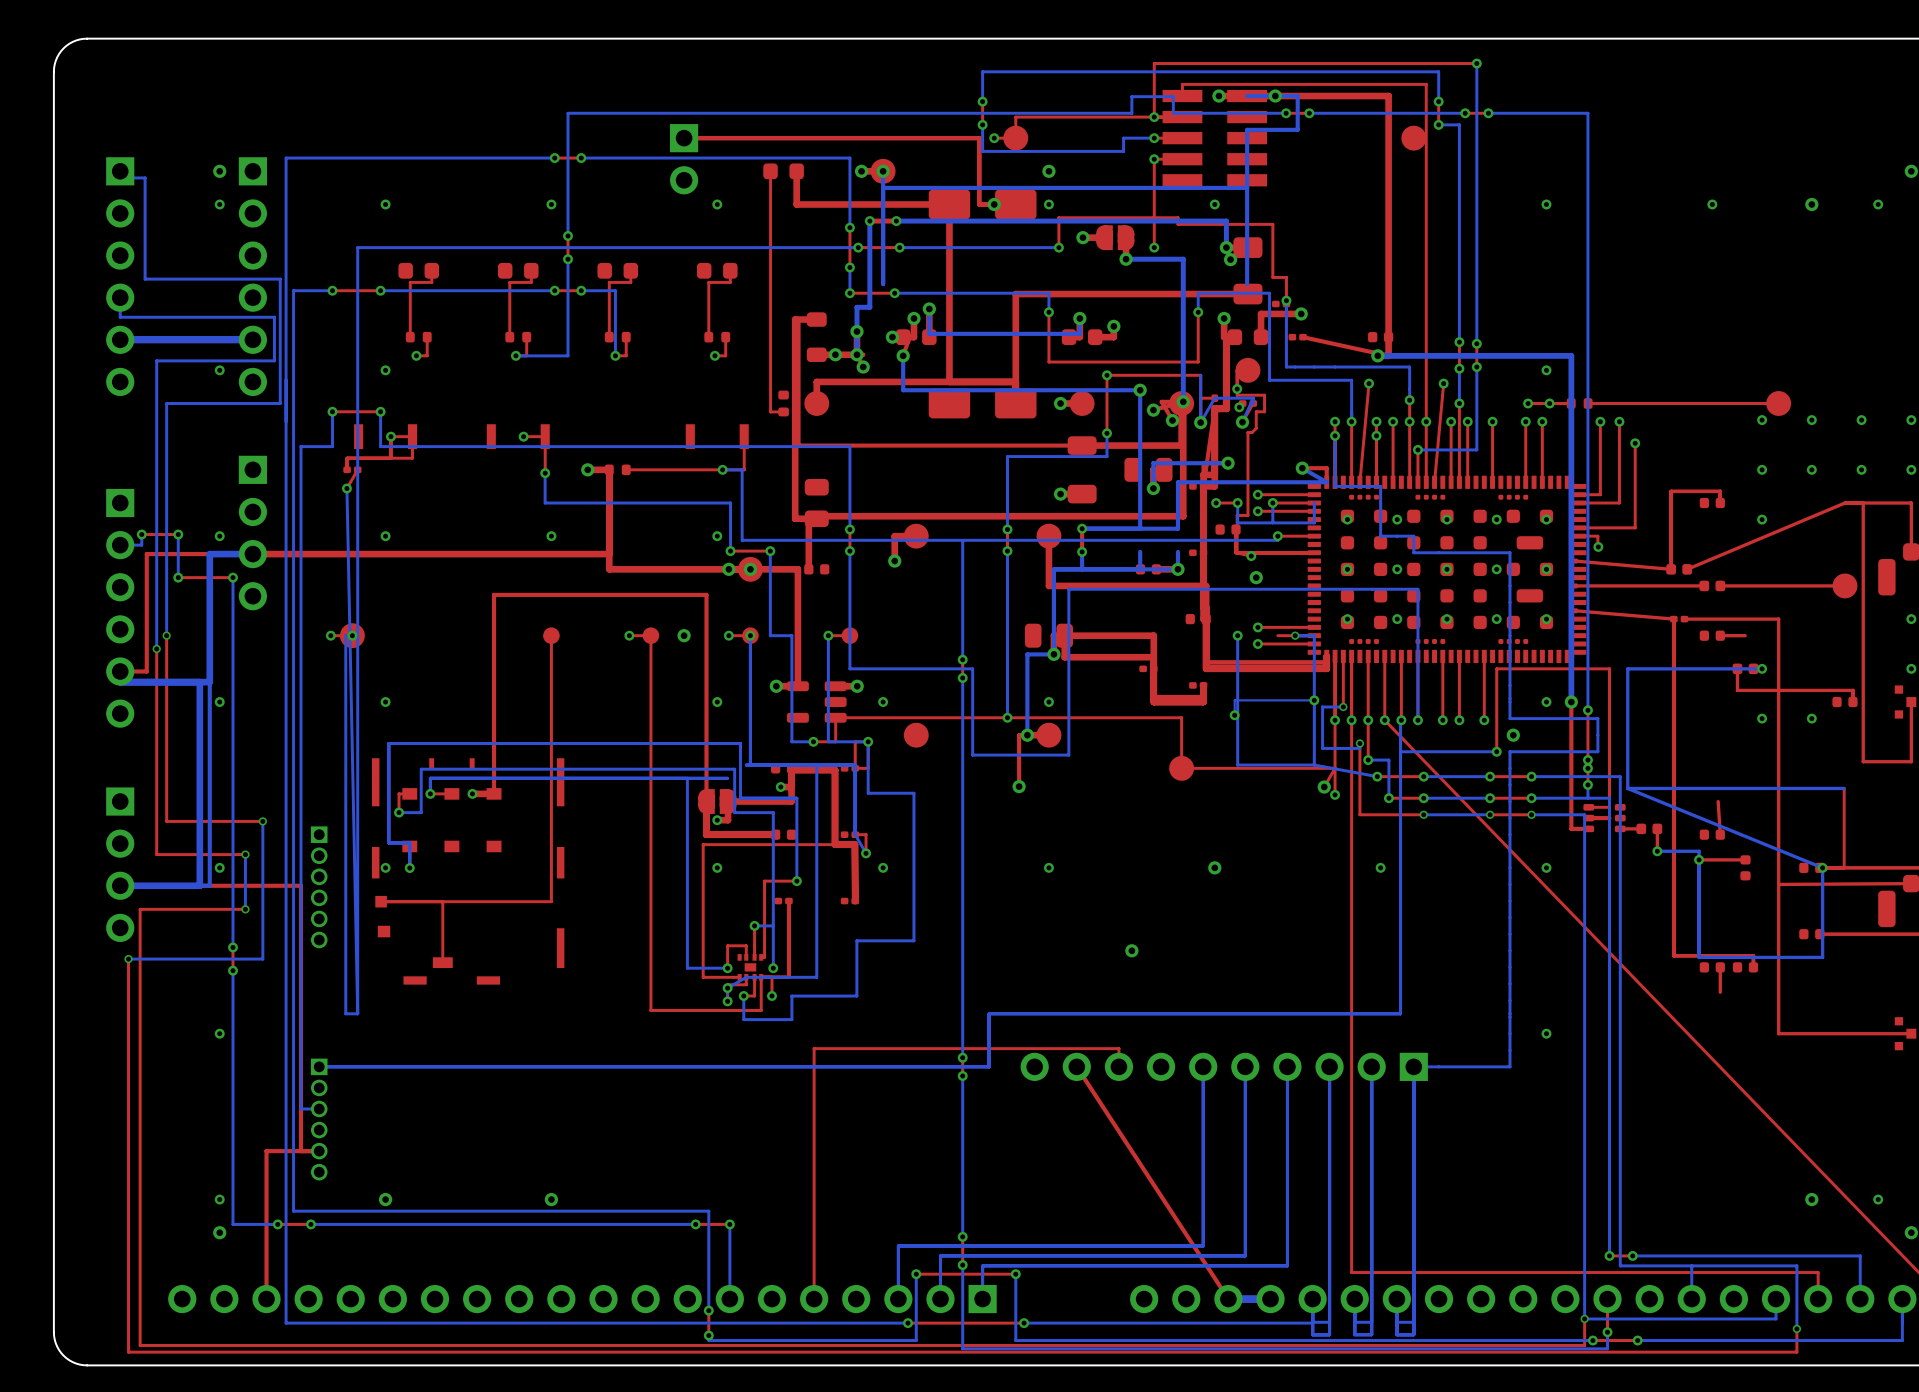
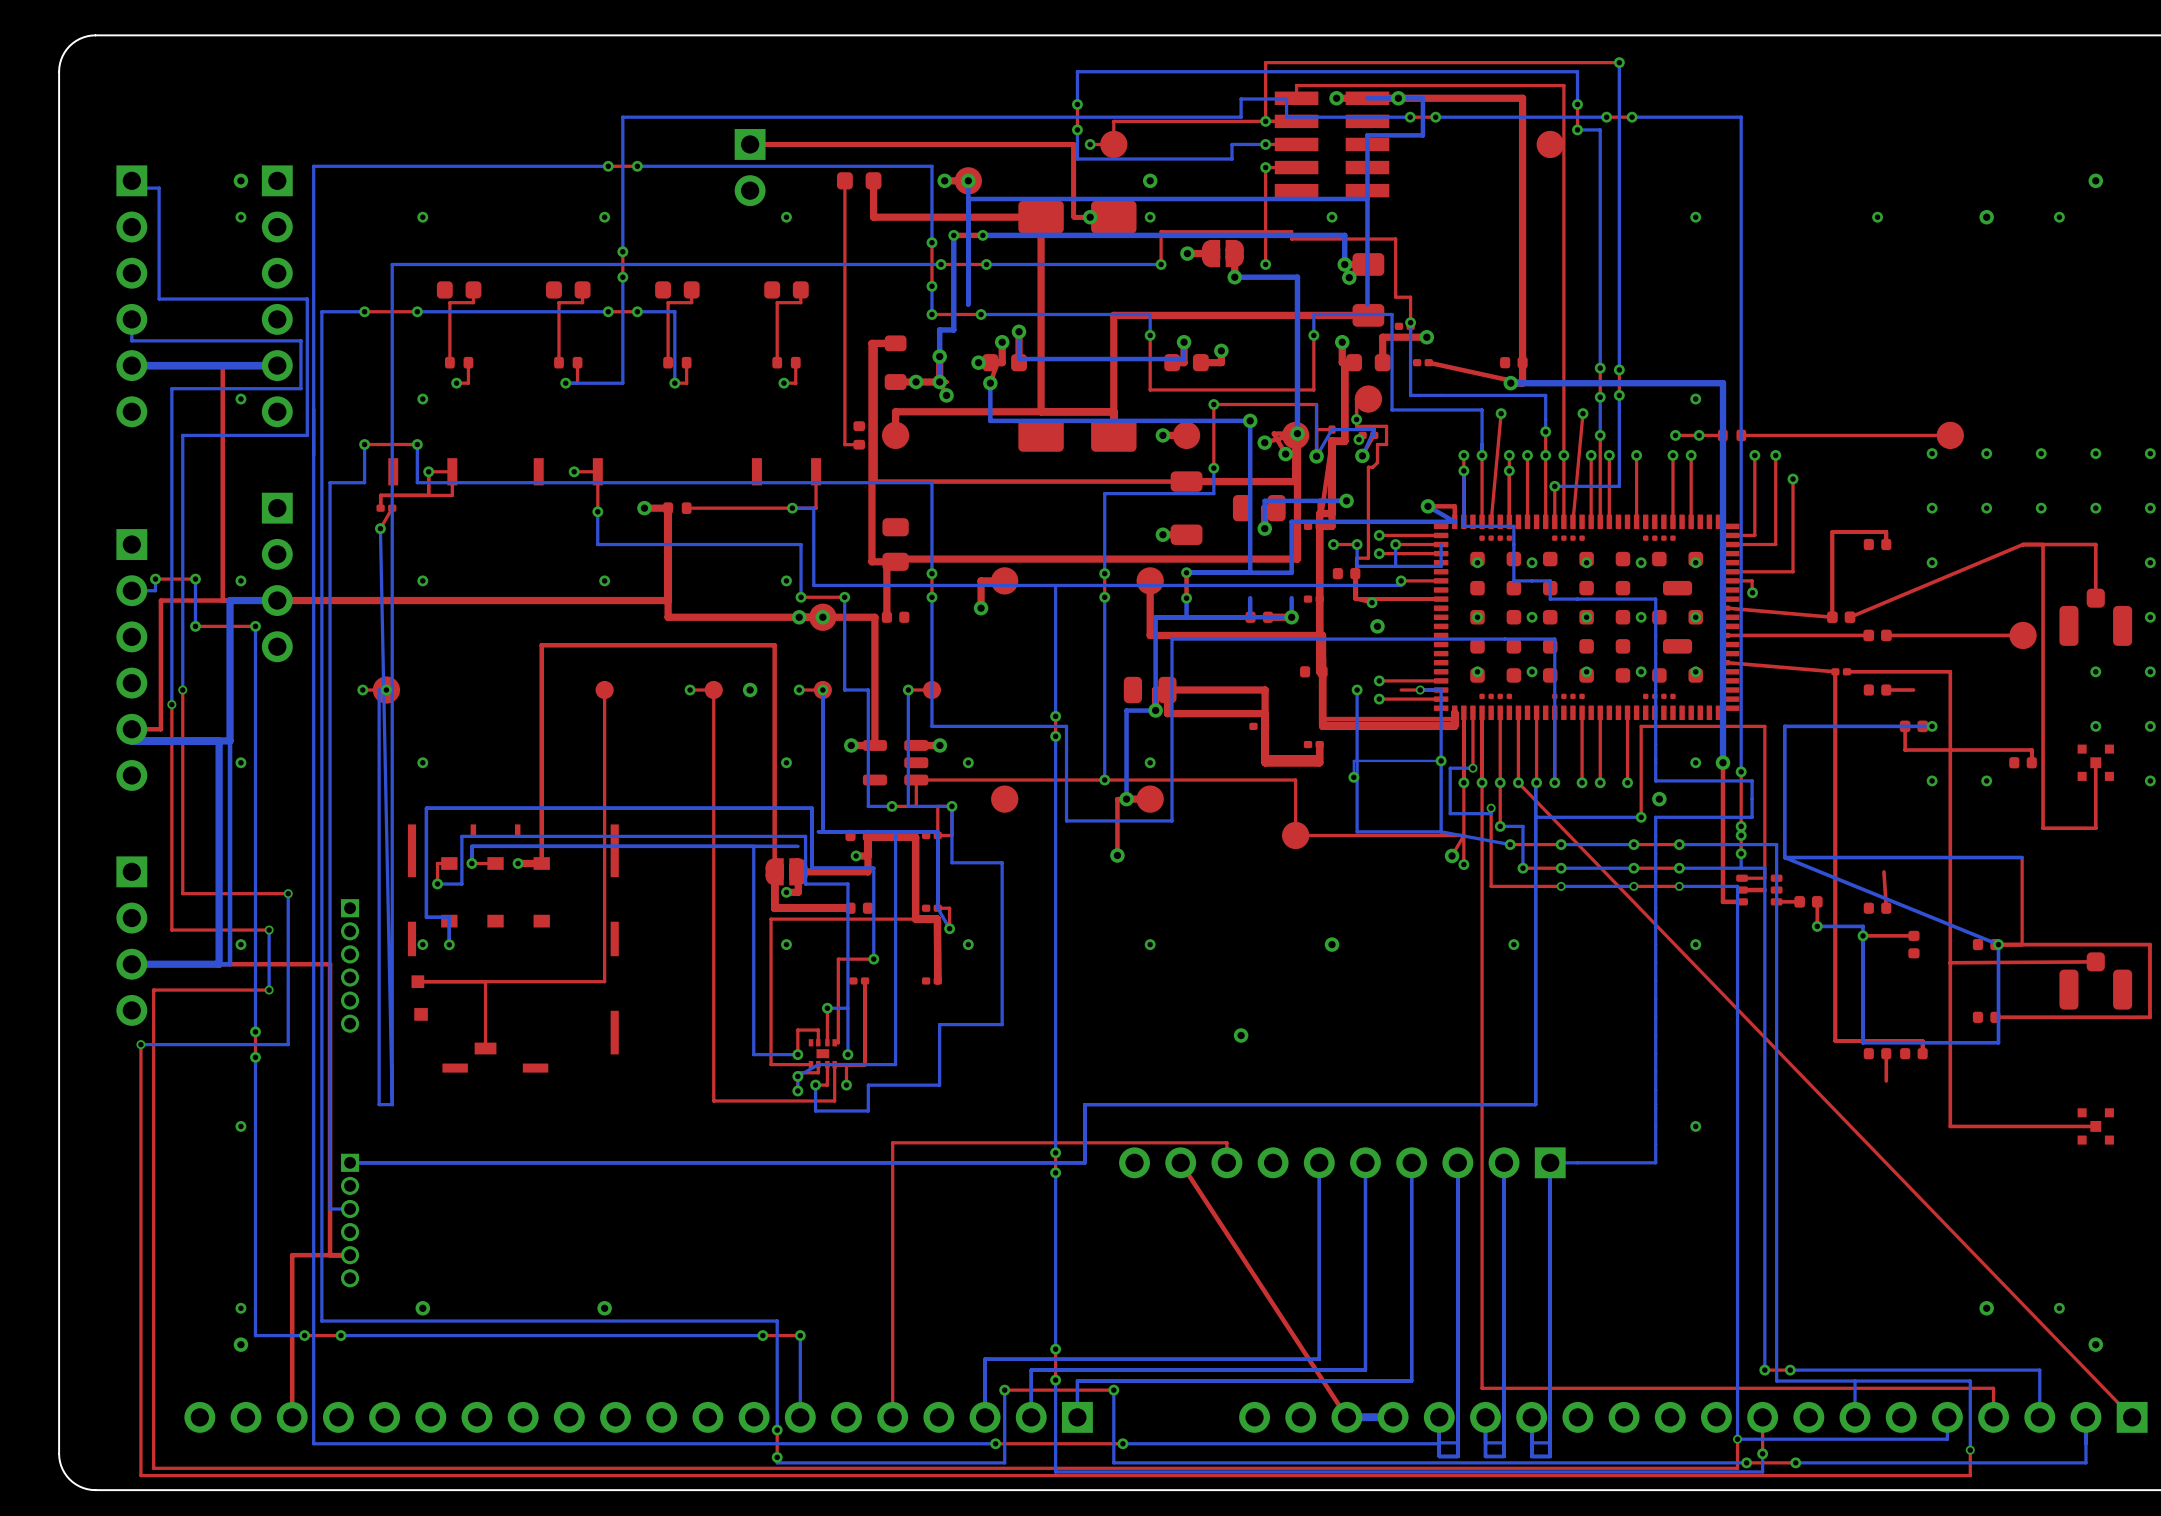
top track: none -> (277, 365) (222, 365) (222, 600)

